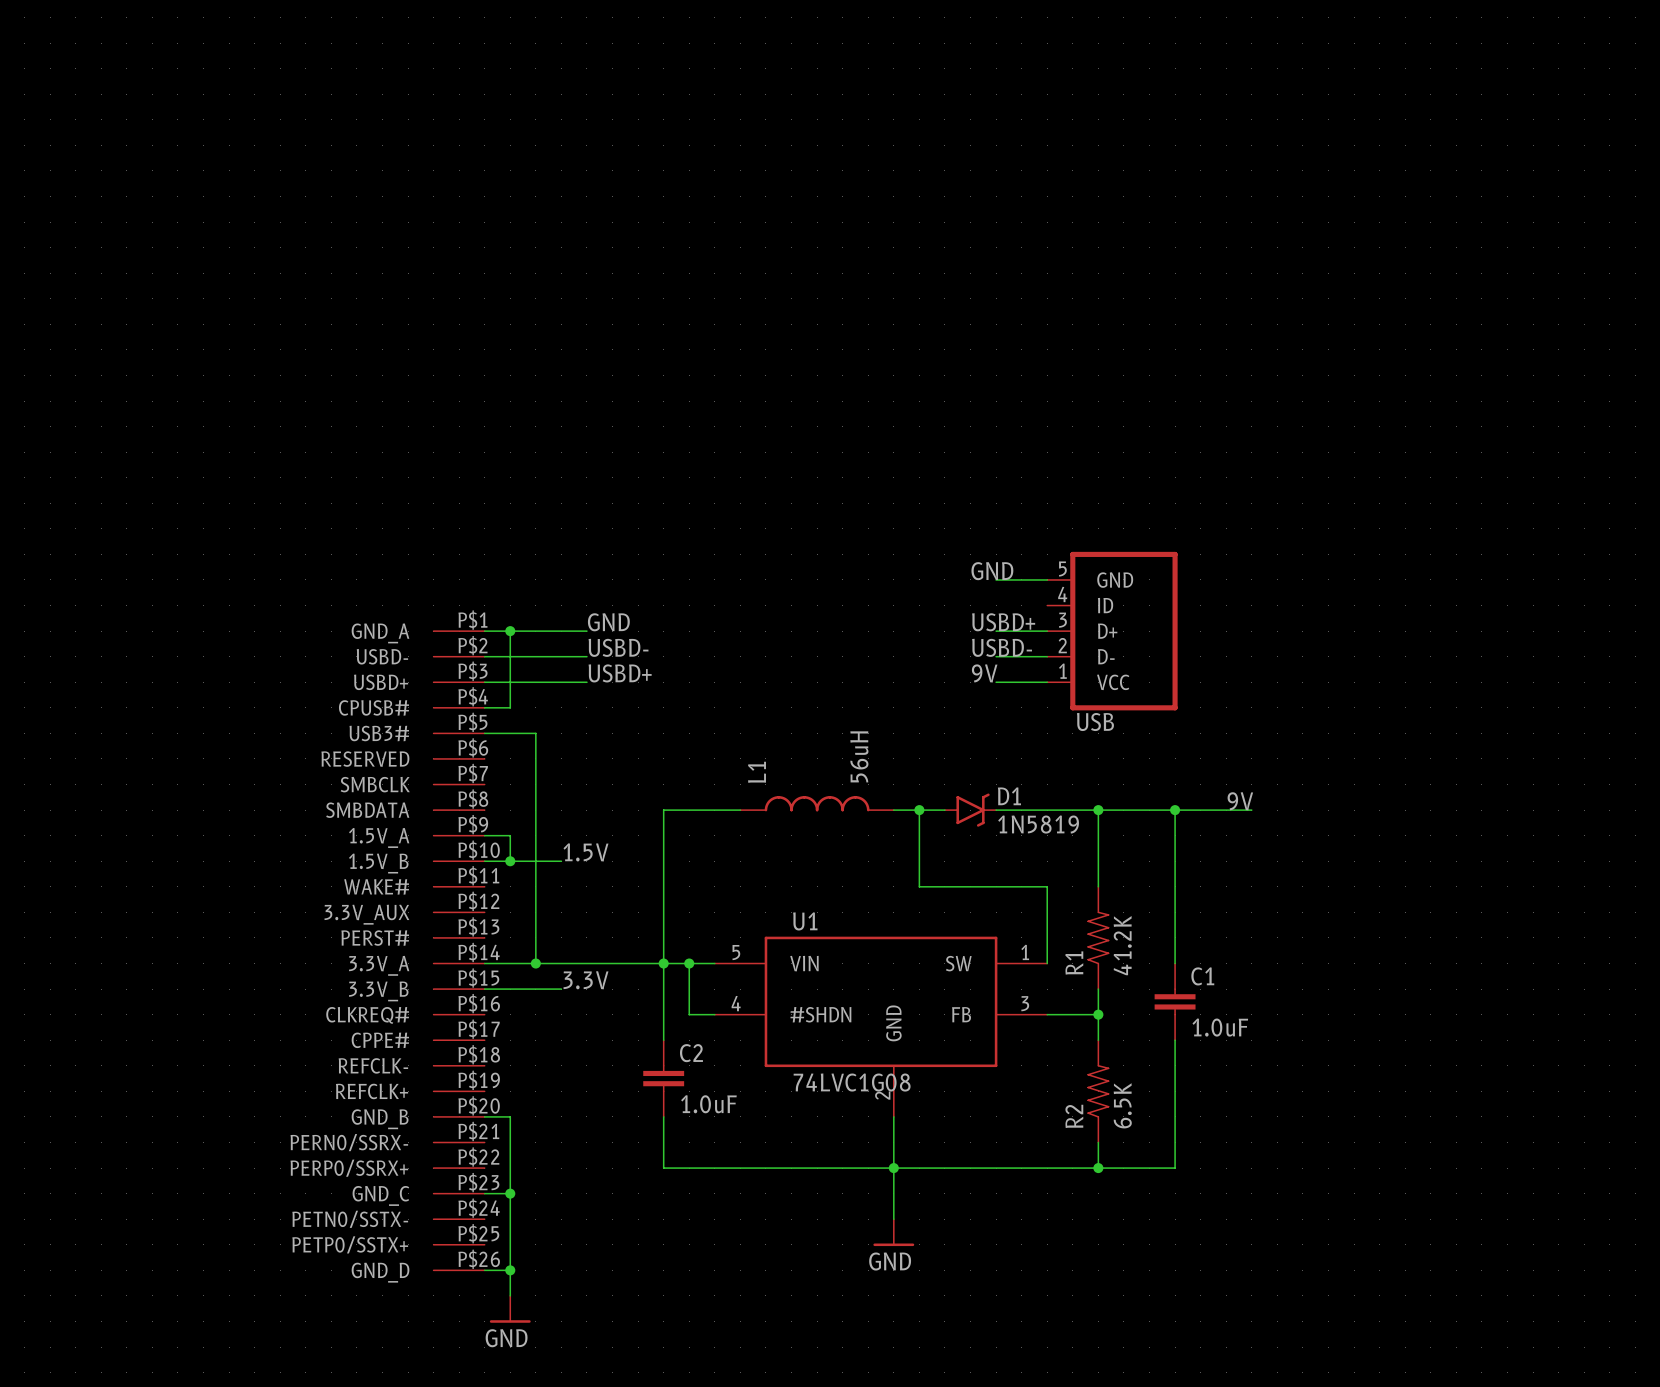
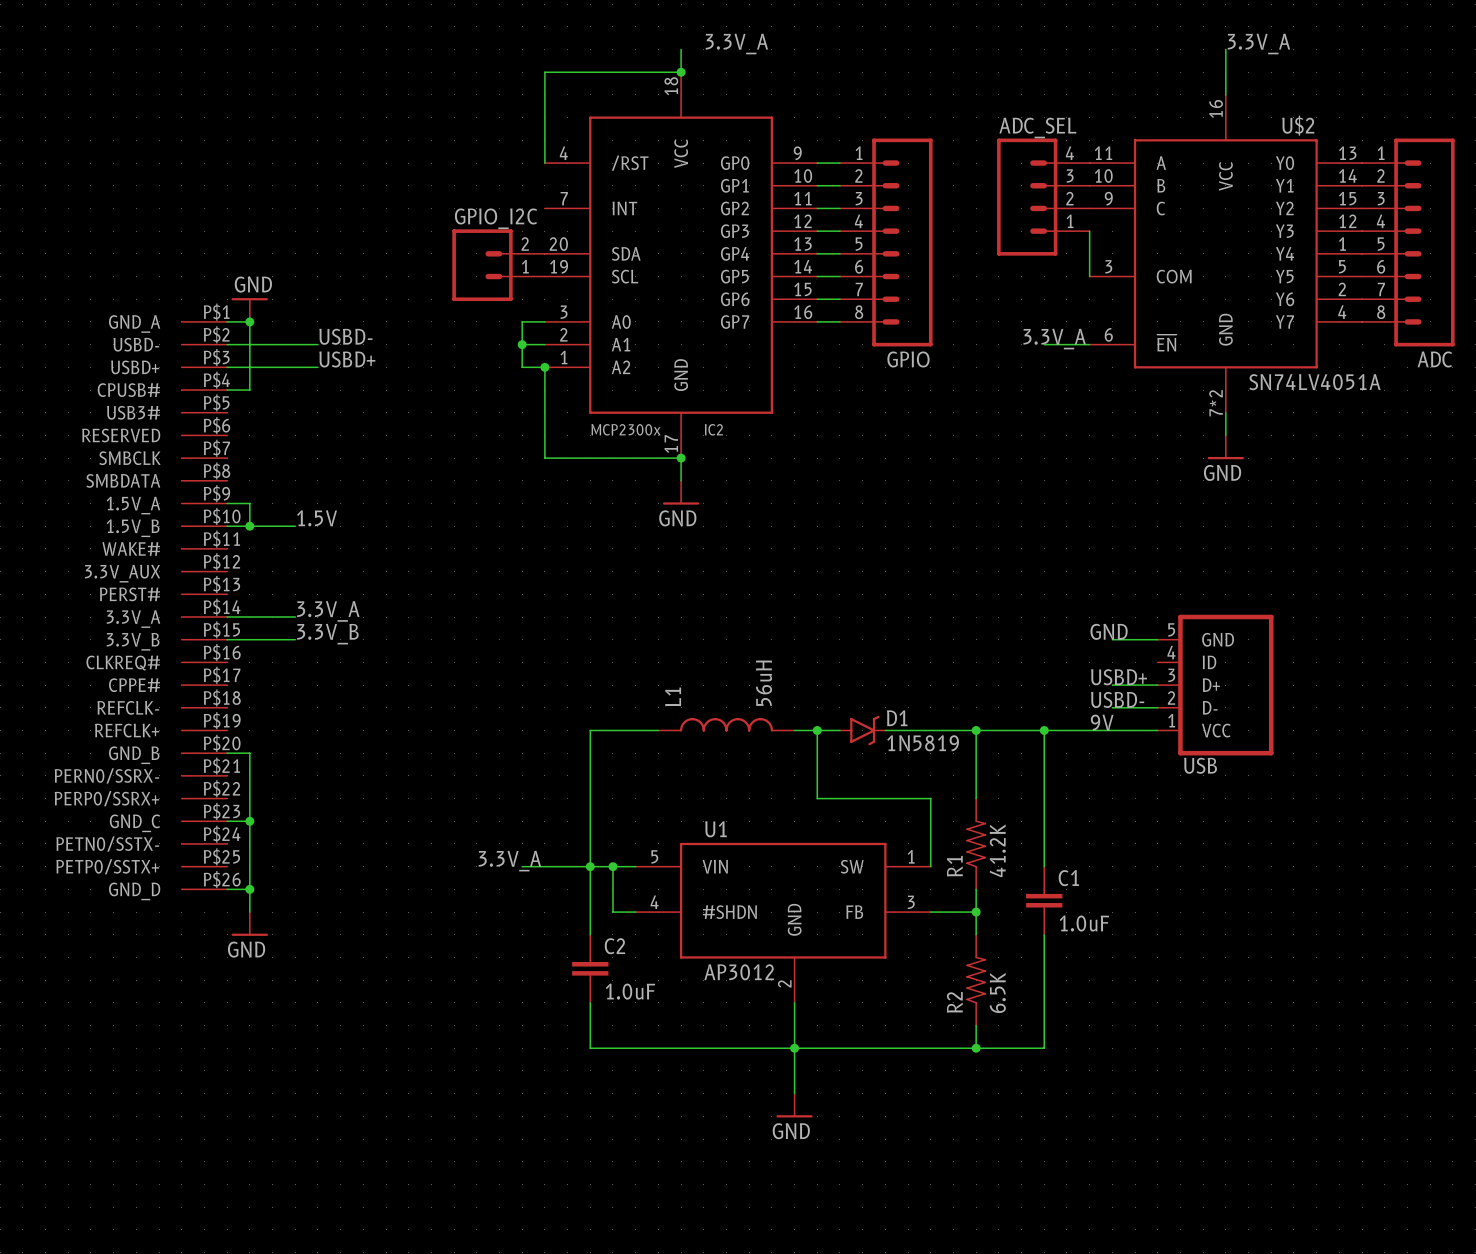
label: none -> 3.3V_A (736, 43)
label: none -> 3.3V_A (1258, 43)
wire: none -> (681, 49) (681, 72) (544, 72) (544, 163)
wire: none -> (1225, 49) (1225, 94)
junction: none -> (681, 72)
wire: none -> (817, 163) (839, 163)
wire: none -> (817, 185) (839, 185)
ADC_SEL: none -> (1043, 197)
wire: none -> (817, 208) (839, 208)
wire: none -> (817, 231) (839, 231)
wire: none -> (1089, 231) (1089, 276)
GPIO: none -> (886, 242)
ADC: none -> (1408, 242)
wire: none -> (817, 253) (839, 253)
U$2: none -> SN74LV4051A (1225, 253)
GPIO_I2C: none -> (498, 265)
IC2: none -> (681, 265)
wire: none -> (817, 276) (839, 276)
wire: none -> (817, 299) (839, 299)
power symbol: none -> GND (249, 310)
wire: none -> (227, 321) (249, 321) (249, 390) (227, 390)
junction: none -> (249, 321)
wire: none -> (544, 321) (522, 321) (522, 367) (544, 367) (544, 458) (681, 458) (681, 480)
wire: none -> (817, 321) (839, 321)
label: none -> USBD- (345, 336)
label: none -> 3.3V_A (1054, 339)
wire: none -> (227, 344) (317, 344)
wire: none -> (522, 344) (544, 344)
junction: none -> (522, 344)
wire: none -> (1044, 344) (1089, 344)
label: none -> USBD+ (347, 359)
wire: none -> (227, 367) (317, 367)
junction: none -> (544, 367)
wire: none -> (1225, 412) (1225, 435)
power symbol: none -> GND (1225, 447)
junction: none -> (681, 458)
power symbol: none -> GND (681, 492)
wire: none -> (227, 503) (249, 503) (249, 526)
label: none -> 1.5V (317, 518)
label: GND (992, 571) -> none
wire: none -> (227, 526) (295, 526)
junction: none -> (249, 526)
wire: (996, 579) (1047, 579) -> none
label: GND (608, 622) -> none
label: USBD+ (1003, 622) -> none
wire: (484, 631) (586, 631) -> none
wire: (510, 631) (510, 707) (484, 707) -> none
junction: (510, 631) -> none
wire: (996, 631) (1047, 631) -> none
USB: (1112, 631) -> none
label: USBD- (618, 647) -> none
label: USBD- (1002, 647) -> none
wire: (484, 656) (586, 656) -> none
wire: (996, 656) (1047, 656) -> none
part: none -> (204, 605)
label: USBD+ (620, 673) -> none
label: 9V (984, 673) -> none
label: none -> 3.3V_A (328, 611)
wire: none -> (227, 617) (295, 617)
wire: (484, 682) (586, 682) -> none
wire: (996, 682) (1047, 682) -> none
label: none -> GND (1109, 631)
label: none -> 3.3V_B (327, 634)
wire: none -> (227, 639) (295, 639)
wire: none -> (1112, 639) (1157, 639)
wire: (484, 733) (535, 733) (535, 963) -> none
label: none -> USBD+ (1119, 677)
wire: none -> (1112, 685) (1157, 685)
USB: none -> (1215, 685)
label: none -> USBD- (1117, 699)
wire: none -> (1112, 707) (1157, 707)
wire: none -> (1112, 730) (1157, 730)
wire: none -> (227, 753) (249, 753) (249, 912)
wire: (484, 835) (510, 835) (510, 861) -> none
label: 1.5V (585, 852) -> none
wire: (484, 861) (561, 861) -> none
junction: (510, 861) -> none
wire: none -> (227, 821) (249, 821)
junction: none -> (249, 821)
part: (459, 950) -> none
wire: (484, 963) (586, 963) -> none
junction: (535, 963) -> none
label: 3.3V (586, 980) -> 3.3V_A (509, 861)
wire: none -> (227, 889) (249, 889)
junction: none -> (249, 889)
wire: (484, 989) (561, 989) -> none
power symbol: none -> GND (249, 923)
U1 value: 74LVC1G08 (852, 1082) -> AP3012 (739, 972)
wire: (484, 1116) (510, 1116) (510, 1295) -> none
wire: (484, 1193) (510, 1193) -> none
junction: (510, 1193) -> none
wire: (484, 1270) (510, 1270) -> none
junction: (510, 1270) -> none
power symbol: GND (510, 1309) -> none

